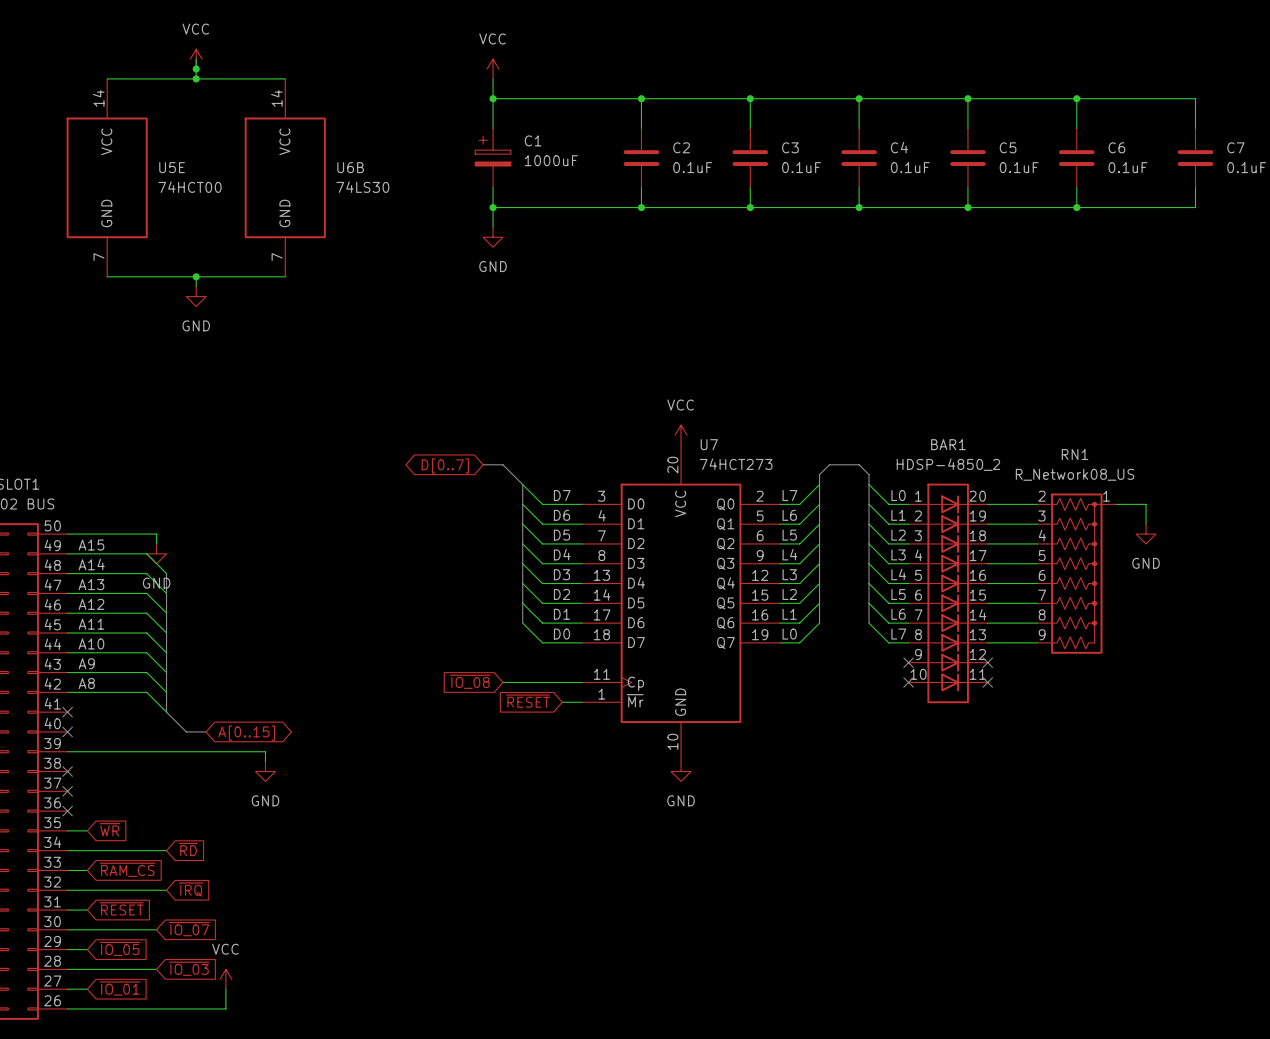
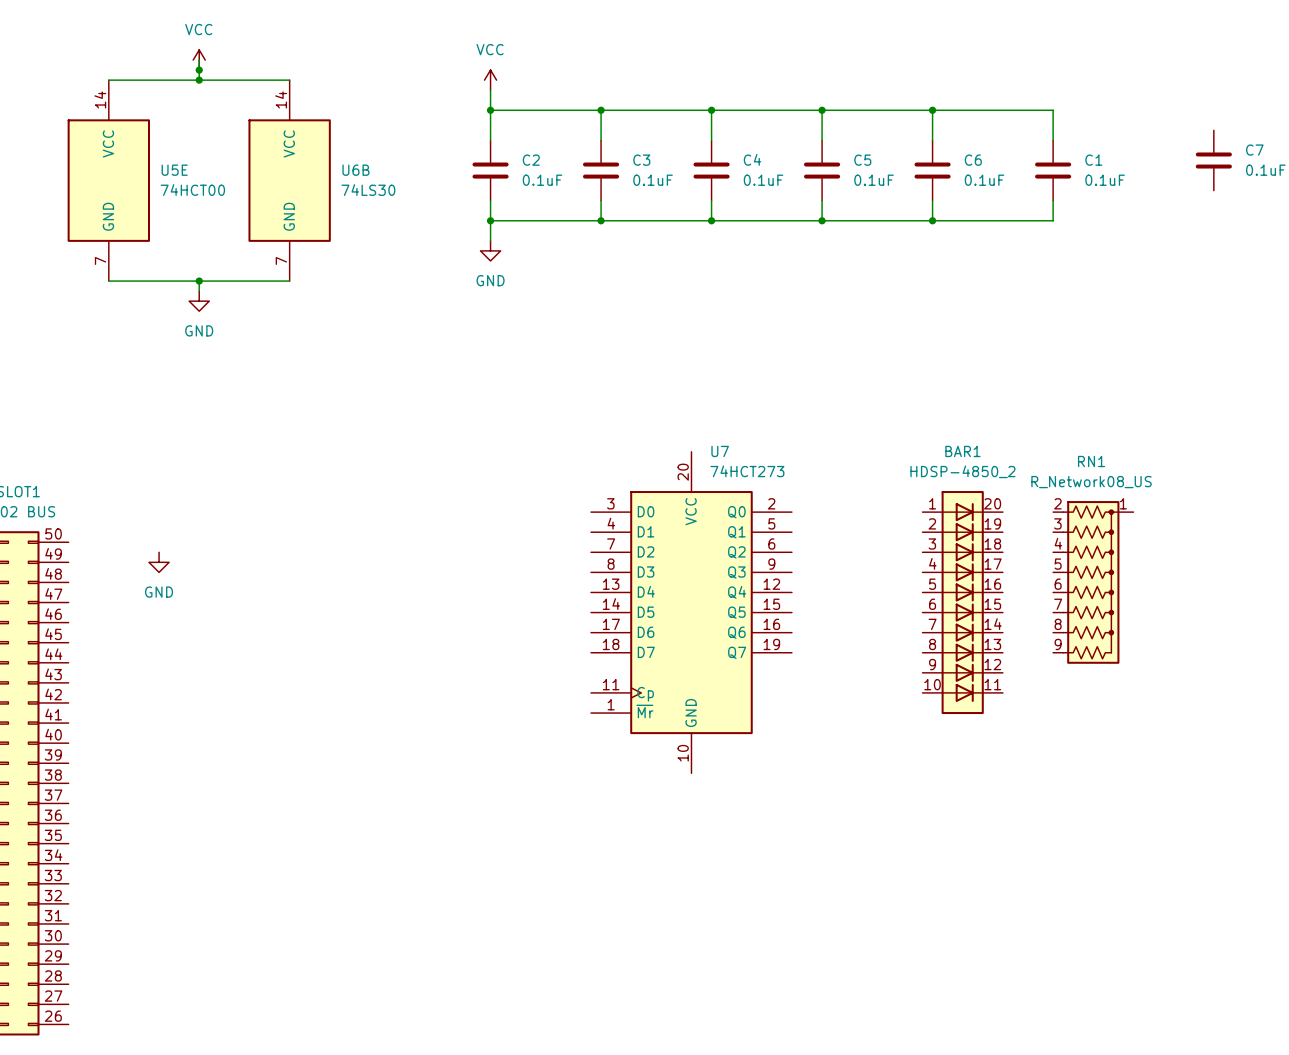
power symbol position: VCC (493, 69) -> VCC (490, 80)
wire: (493, 78) (493, 128) -> (490, 90) (490, 140)
wire: (493, 98) (1195, 98) (1195, 128) -> none
junction position: (493, 98) -> (490, 110)
wire: (641, 98) (641, 128) -> (601, 110) (601, 140)
junction: (641, 98) -> none
wire: (750, 98) (750, 128) -> (711, 110) (711, 140)
junction: (750, 98) -> none
wire: (859, 98) (859, 128) -> (822, 110) (822, 140)
junction: (859, 98) -> none
wire: (967, 98) (967, 128) -> (932, 110) (932, 140)
junction: (967, 98) -> none
wire: (1076, 98) (1076, 128) -> none
junction: (1076, 98) -> none
wire: none -> (490, 110) (1053, 110) (1053, 140)
junction: none -> (601, 110)
junction: none -> (711, 110)
junction: none -> (822, 110)
junction: none -> (932, 110)
C1 symbol: [475, 128, 511, 188] -> [1035, 140, 1072, 201]
C2 position: (641, 158) -> (490, 170)
C3 position: (750, 158) -> (601, 170)
C4 position: (859, 158) -> (711, 170)
C5 position: (967, 158) -> (822, 170)
C6 position: (1076, 158) -> (932, 170)
C1 value: 1000uF (551, 160) -> 0.1uF (1105, 180)
wire: (493, 187) (493, 227) -> (490, 200) (490, 240)
wire: (641, 187) (641, 207) -> (601, 200) (601, 220)
wire: (750, 187) (750, 207) -> (711, 200) (711, 220)
wire: (859, 187) (859, 207) -> (822, 200) (822, 220)
wire: (967, 187) (967, 207) -> (932, 200) (932, 220)
wire: (1076, 187) (1076, 207) -> none
wire: (1195, 187) (1195, 207) (493, 207) -> none
wire: none -> (1053, 200) (1053, 220) (490, 220)
junction position: (493, 207) -> (490, 220)
junction: (641, 207) -> none
junction: (750, 207) -> none
junction: (859, 207) -> none
junction: (967, 207) -> none
junction: (1076, 207) -> none
junction: none -> (601, 220)
junction: none -> (711, 220)
junction: none -> (822, 220)
junction: none -> (932, 220)
power symbol position: GND (493, 237) -> GND (490, 250)
power symbol: VCC (681, 435) -> none
bus: (483, 464) (502, 464) (522, 484) (522, 623) -> none
global label: D[0..7] (445, 465) -> none
wire: (522, 484) (542, 504) (582, 504) -> none
wire: (819, 484) (799, 504) (779, 504) -> none
wire: (869, 484) (888, 504) (908, 504) -> none
label: D7 (562, 495) -> none
label: L7 (789, 495) -> none
label: L0 (898, 495) -> none
wire: (522, 504) (542, 524) (582, 524) -> none
wire: (819, 504) (799, 524) (779, 524) -> none
wire: (869, 504) (888, 524) (908, 524) -> none
wire: (987, 504) (1037, 504) -> none
wire: (1116, 504) (1146, 504) (1146, 524) -> none
label: D6 (561, 515) -> none
label: L6 (789, 515) -> none
label: L1 (898, 515) -> none
wire: (522, 524) (542, 543) (582, 543) -> none
wire: (819, 524) (799, 543) (779, 543) -> none
wire: (869, 524) (888, 543) (908, 543) -> none
wire: (987, 524) (1037, 524) -> none
wire: (67, 534) (156, 534) (156, 543) -> none
power symbol: GND (1146, 534) -> none
label: D5 (561, 535) -> none
label: L5 (789, 535) -> none
label: L2 (898, 535) -> none
wire: (522, 543) (542, 563) (582, 563) -> none
wire: (819, 543) (799, 563) (779, 563) -> none
wire: (869, 543) (888, 563) (908, 563) -> none
wire: (987, 543) (1037, 543) -> none
label: A15 (91, 545) -> none
wire: (67, 553) (146, 553) (166, 573) -> none
label: D4 (562, 554) -> none
label: L4 (789, 554) -> none
label: L3 (898, 554) -> none
wire: (522, 563) (542, 583) (582, 583) -> none
wire: (819, 563) (799, 583) (779, 583) -> none
wire: (869, 563) (888, 583) (908, 583) -> none
wire: (987, 563) (1037, 563) -> none
label: A14 (91, 564) -> none
wire: (67, 573) (146, 573) (166, 593) -> none
bus: (166, 573) (166, 712) (186, 731) (206, 731) -> none
label: D3 (561, 574) -> none
label: L3 (789, 574) -> none
label: L4 (898, 574) -> none
wire: (522, 583) (542, 603) (582, 603) -> none
wire: (819, 583) (799, 603) (779, 603) -> none
wire: (869, 583) (888, 603) (908, 603) -> none
wire: (987, 583) (1037, 583) -> none
label: A13 (91, 584) -> none
wire: (67, 593) (146, 593) (166, 613) -> none
label: D2 (561, 594) -> none
label: L2 (789, 594) -> none
label: L5 (898, 594) -> none
wire: (522, 603) (542, 623) (582, 623) -> none
wire: (819, 603) (799, 623) (779, 623) -> none
wire: (869, 603) (888, 623) (908, 623) -> none
wire: (987, 603) (1037, 603) -> none
label: A12 (91, 604) -> none
wire: (67, 613) (146, 613) (166, 633) -> none
label: D1 (561, 614) -> none
label: L1 (789, 614) -> none
label: L6 (898, 614) -> none
wire: (522, 623) (542, 642) (582, 642) -> none
wire: (819, 623) (799, 642) (779, 642) -> none
bus: (819, 623) (819, 474) (829, 464) (859, 464) (869, 474) (869, 623) -> none
wire: (869, 623) (888, 642) (908, 642) -> none
wire: (987, 623) (1037, 623) -> none
label: A11 (91, 624) -> none
wire: (67, 633) (146, 633) (166, 652) -> none
label: D0 (561, 634) -> none
label: L0 (789, 634) -> none
label: L7 (898, 634) -> none
wire: (987, 642) (1037, 642) -> none
label: A10 (91, 643) -> none
wire: (67, 652) (146, 652) (166, 672) -> none
no-connect mark: (908, 662) -> none
no-connect mark: (987, 662) -> none
label: A9 (86, 663) -> none
wire: (67, 672) (146, 672) (166, 692) -> none
global label: ~{IO_08} (470, 681) -> none
wire: (502, 682) (582, 682) -> none
no-connect mark: (908, 682) -> none
no-connect mark: (987, 682) -> none
label: A8 (86, 683) -> none
wire: (67, 692) (146, 692) (166, 712) -> none
global label: ~{RESET} (528, 701) -> none
wire: (562, 702) (582, 702) -> none
no-connect mark: (67, 712) -> none
no-connect mark: (67, 731) -> none
global label: A[0..15] (246, 733) -> none
wire: (67, 751) (265, 751) (265, 761) -> none
no-connect mark: (67, 771) -> none
power symbol: GND (265, 771) -> none
power symbol: GND (681, 771) -> none
no-connect mark: (67, 791) -> none
no-connect mark: (67, 811) -> none
global label: ~{WR} (109, 829) -> none
wire: (67, 830) (87, 830) -> none
global label: ~{RD} (188, 849) -> none
wire: (67, 850) (166, 850) -> none
global label: ~{RAM_CS} (127, 869) -> none
wire: (67, 870) (87, 870) -> none
global label: ~{IRQ} (190, 889) -> none
wire: (67, 890) (166, 890) -> none
global label: ~{RESET} (121, 908) -> none
wire: (67, 910) (87, 910) -> none
wire: (67, 929) (156, 929) -> none
global label: ~{IO_07} (189, 929) -> none
global label: ~{IO_05} (120, 948) -> none
wire: (67, 949) (87, 949) -> none
global label: ~{IO_03} (189, 968) -> none
wire: (67, 969) (156, 969) -> none
power symbol: VCC (225, 979) -> none
global label: ~{IO_01} (120, 988) -> none
wire: (67, 989) (87, 989) -> none
wire: (225, 989) (225, 1008) (67, 1008) -> none

